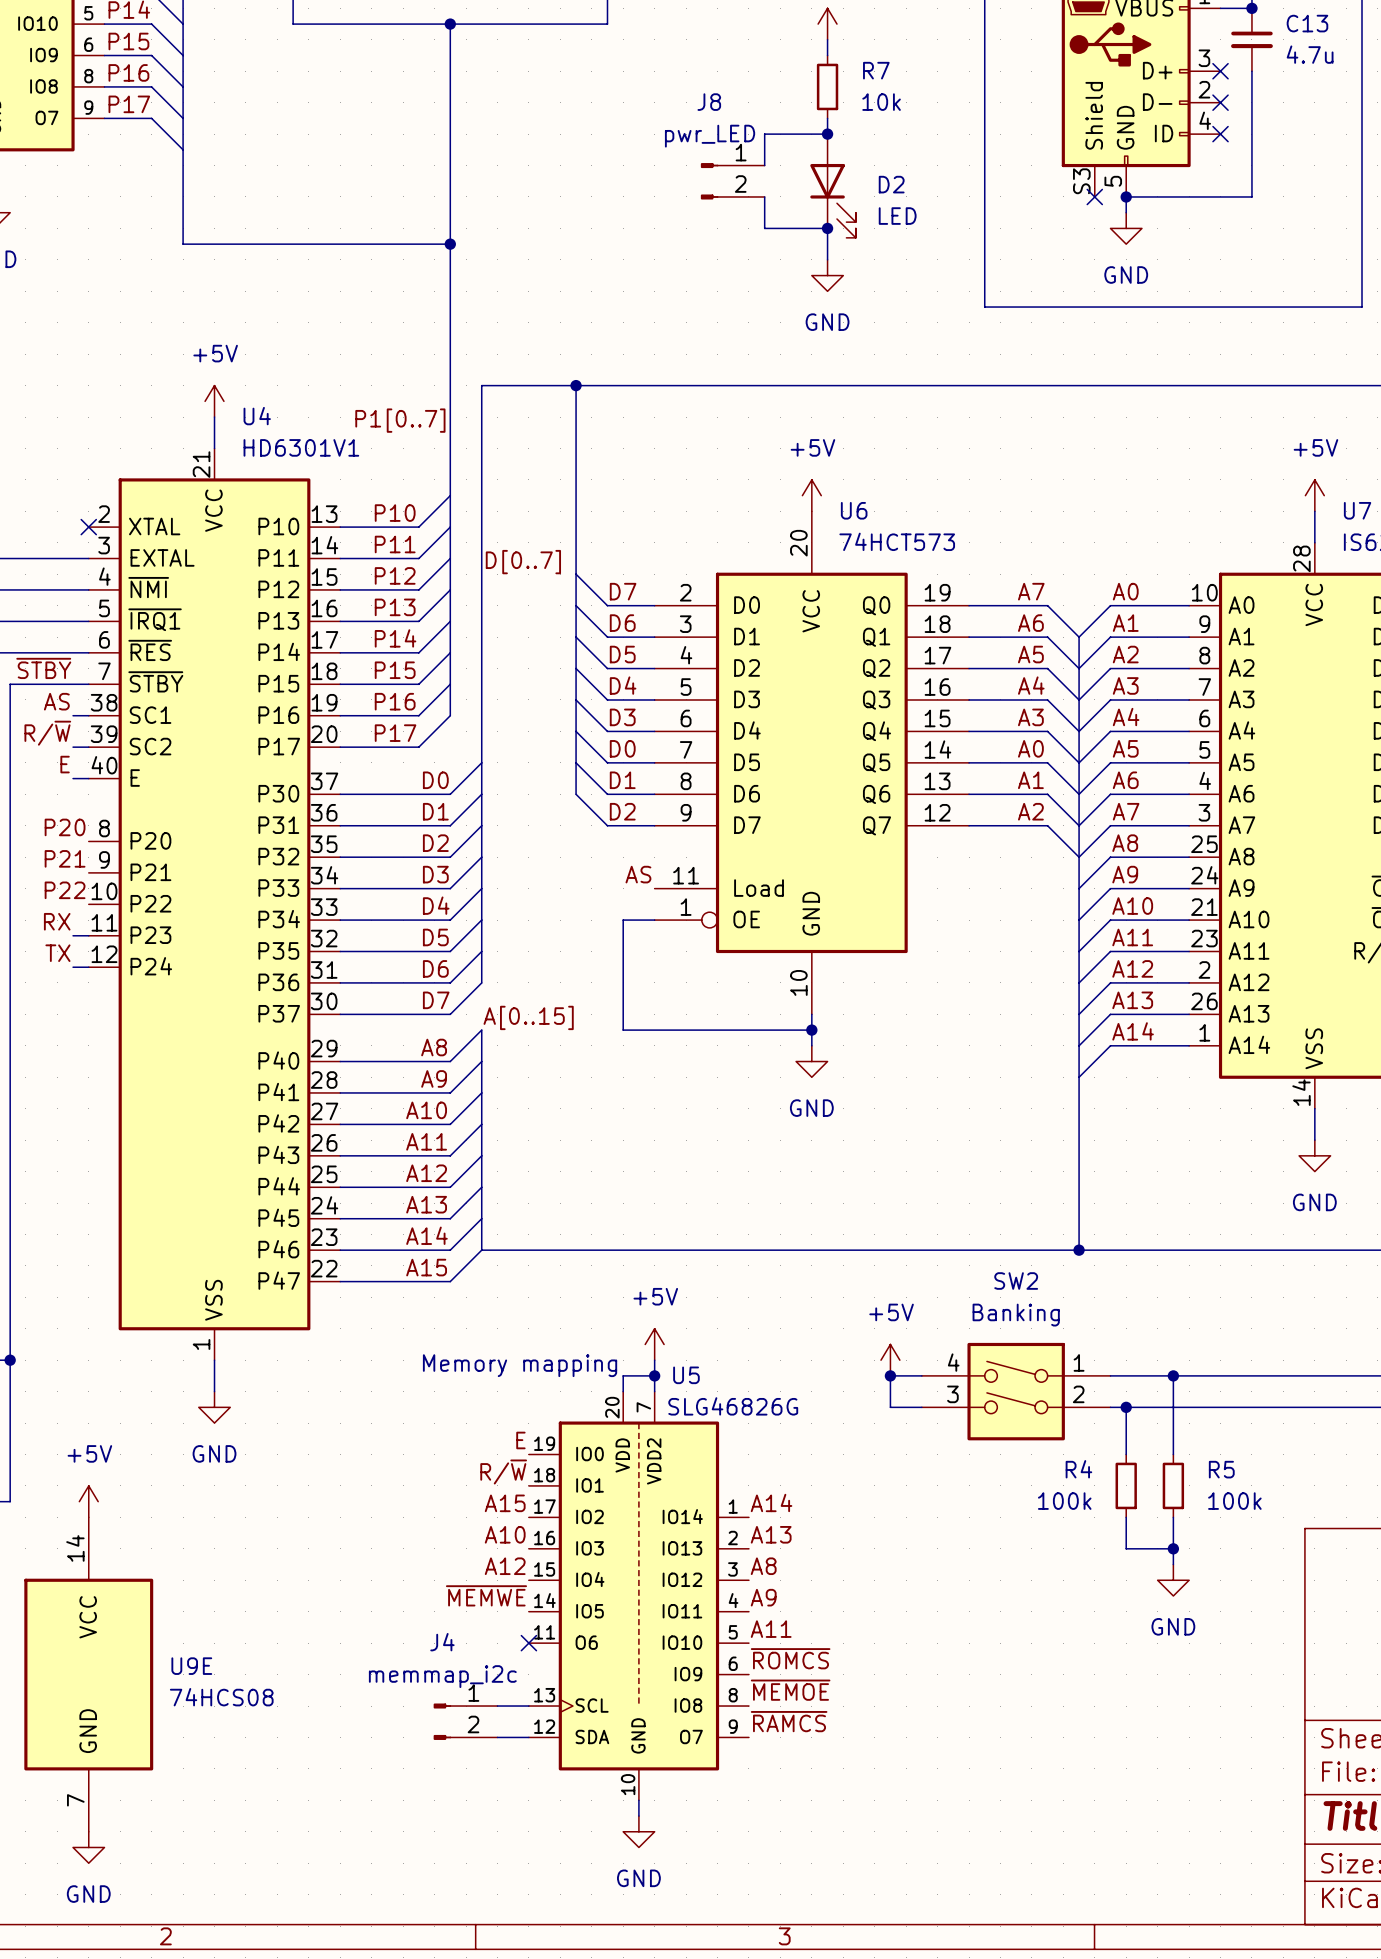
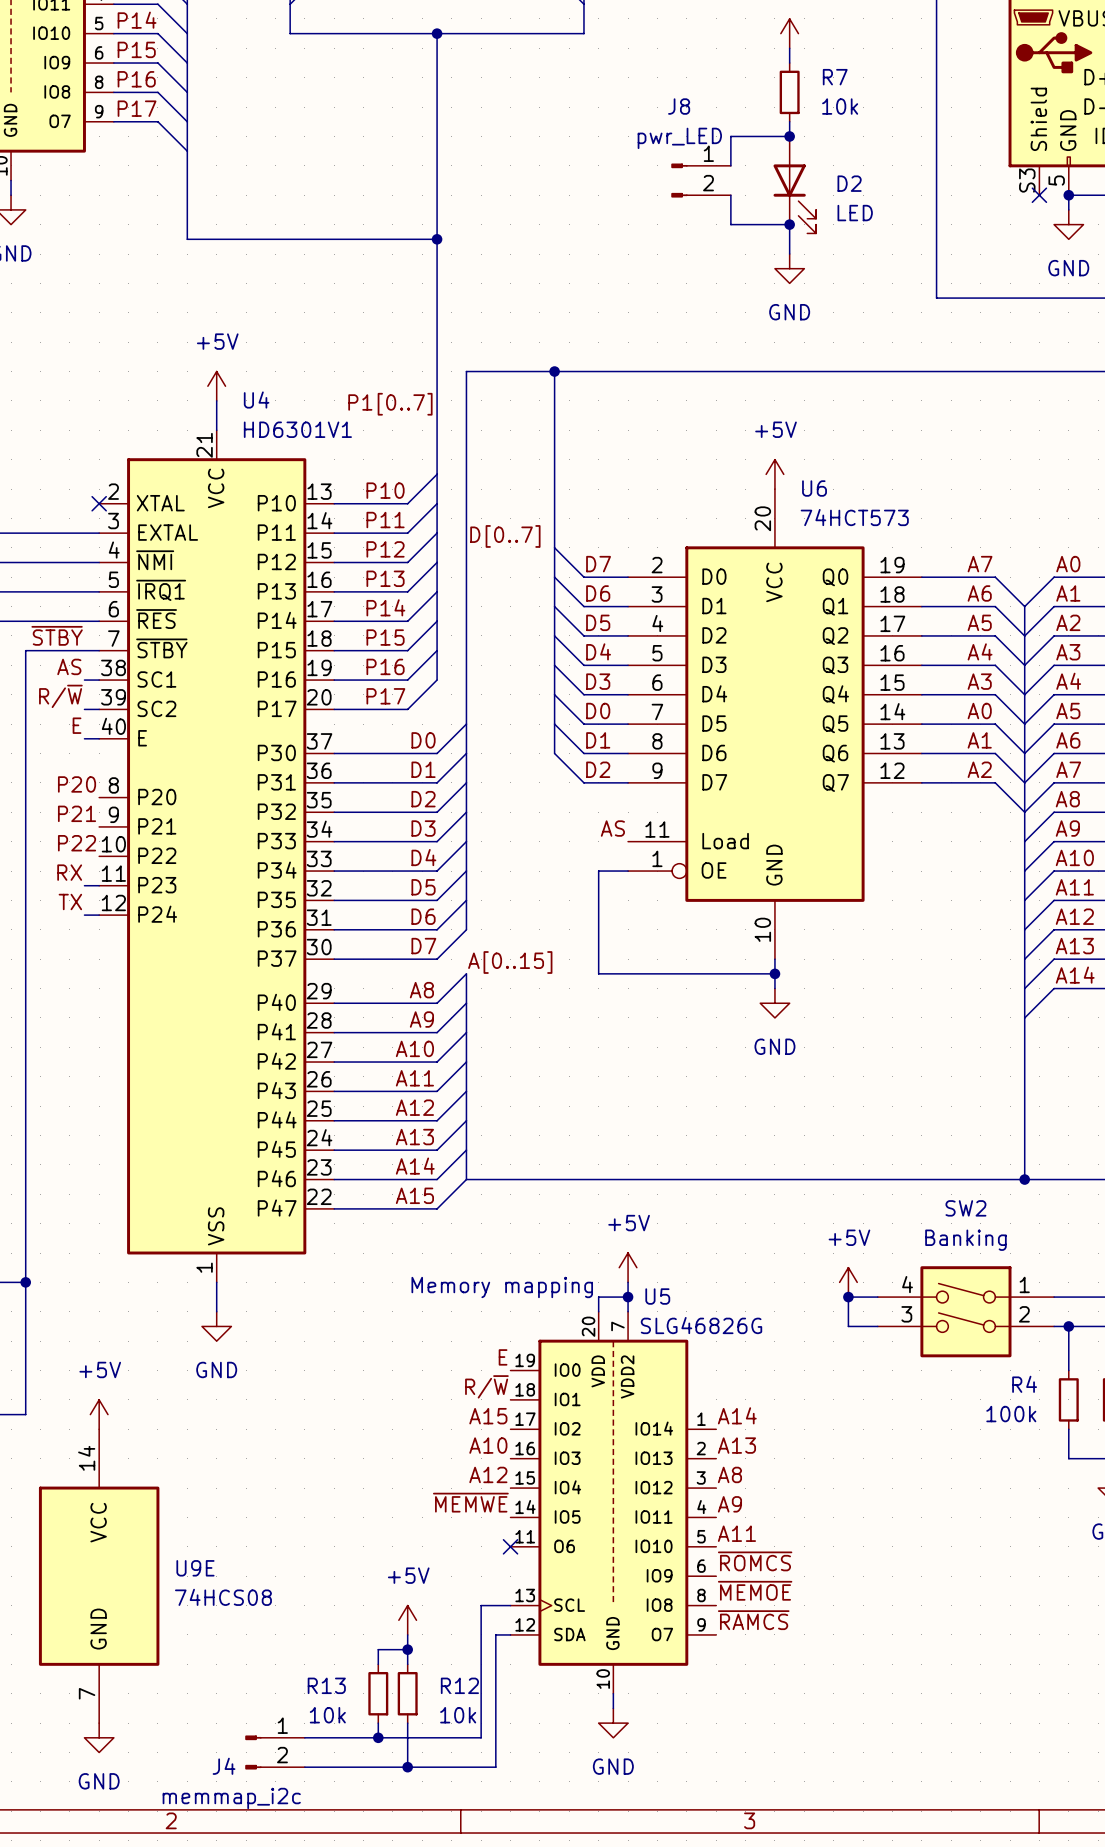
J4 name position: J4 (442, 1642) -> J4 (224, 1766)
J4 value position: memmap_i2c (442, 1676) -> memmap_i2c (231, 1798)
wire: none -> (481, 1605) (481, 1737) (304, 1737)
power symbol: none -> +5V (407, 1620)
J4 position: (465, 1721) -> (275, 1752)
wire: none -> (407, 1634) (407, 1664)
wire: (497, 1737) (513, 1737) -> (304, 1767) (495, 1767) (495, 1634)
wire: none -> (407, 1649) (378, 1649) (378, 1664)
junction: none -> (407, 1649)
R13: none -> 10k (378, 1693)
R12: none -> 10k (407, 1693)
wire: none -> (378, 1723) (378, 1737)
wire: none -> (407, 1723) (407, 1767)
junction: none -> (378, 1737)
junction: none -> (407, 1767)

